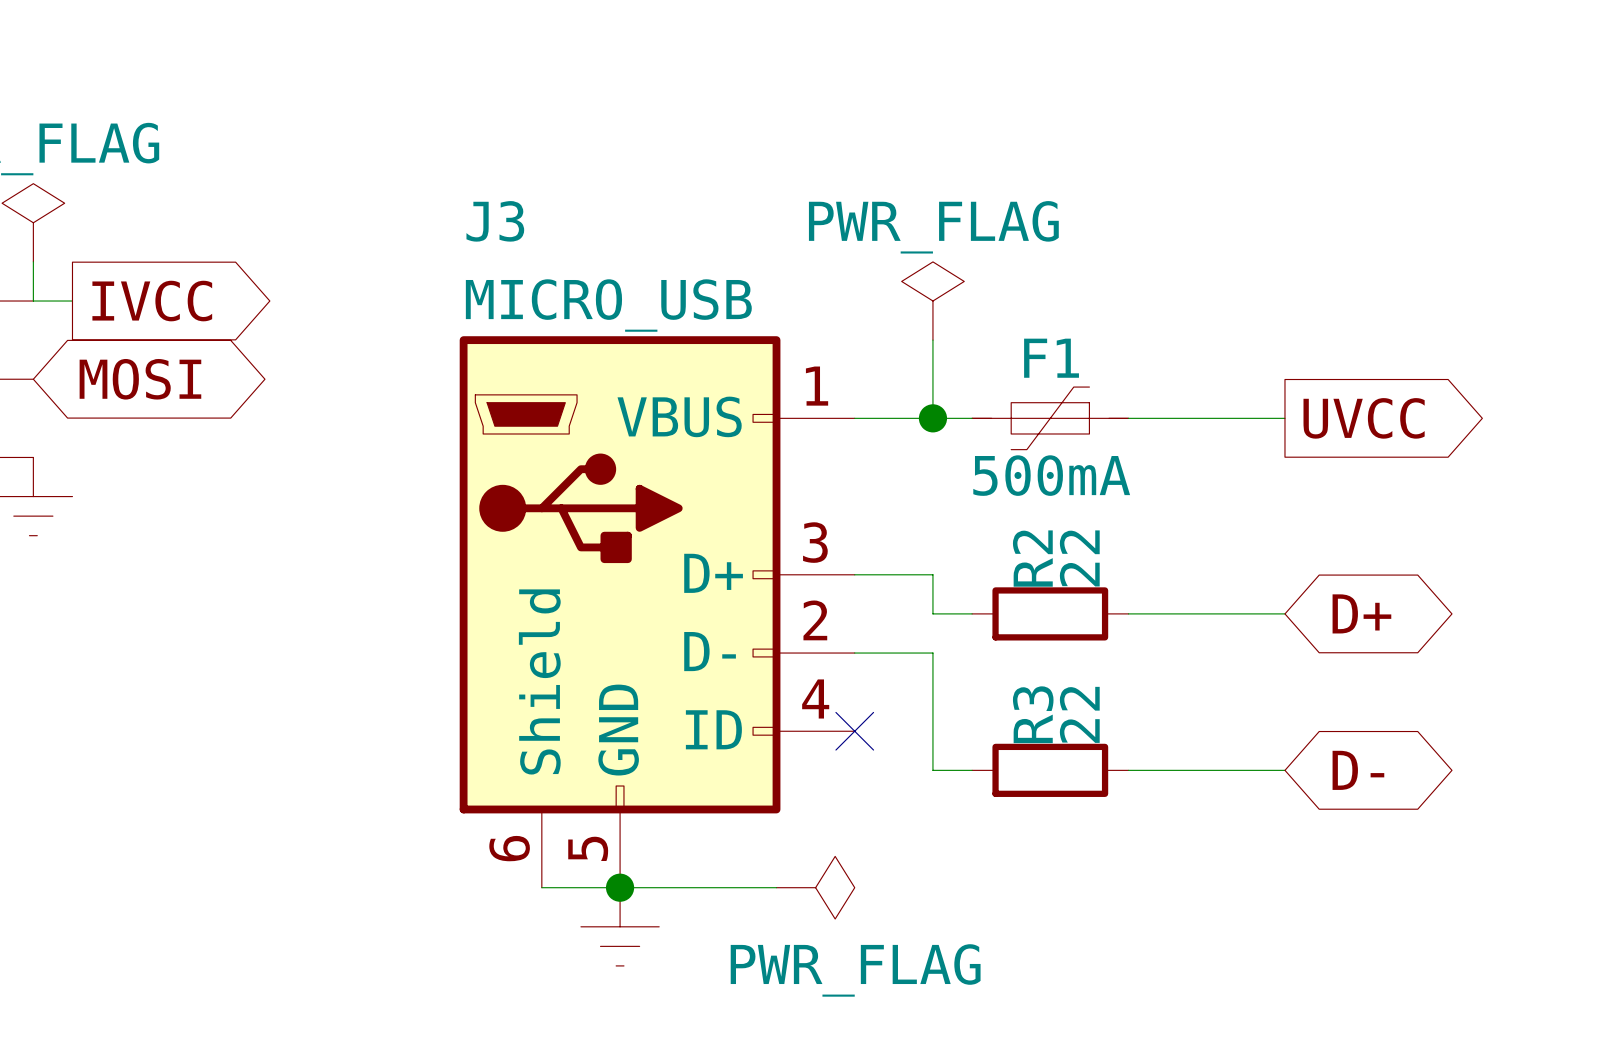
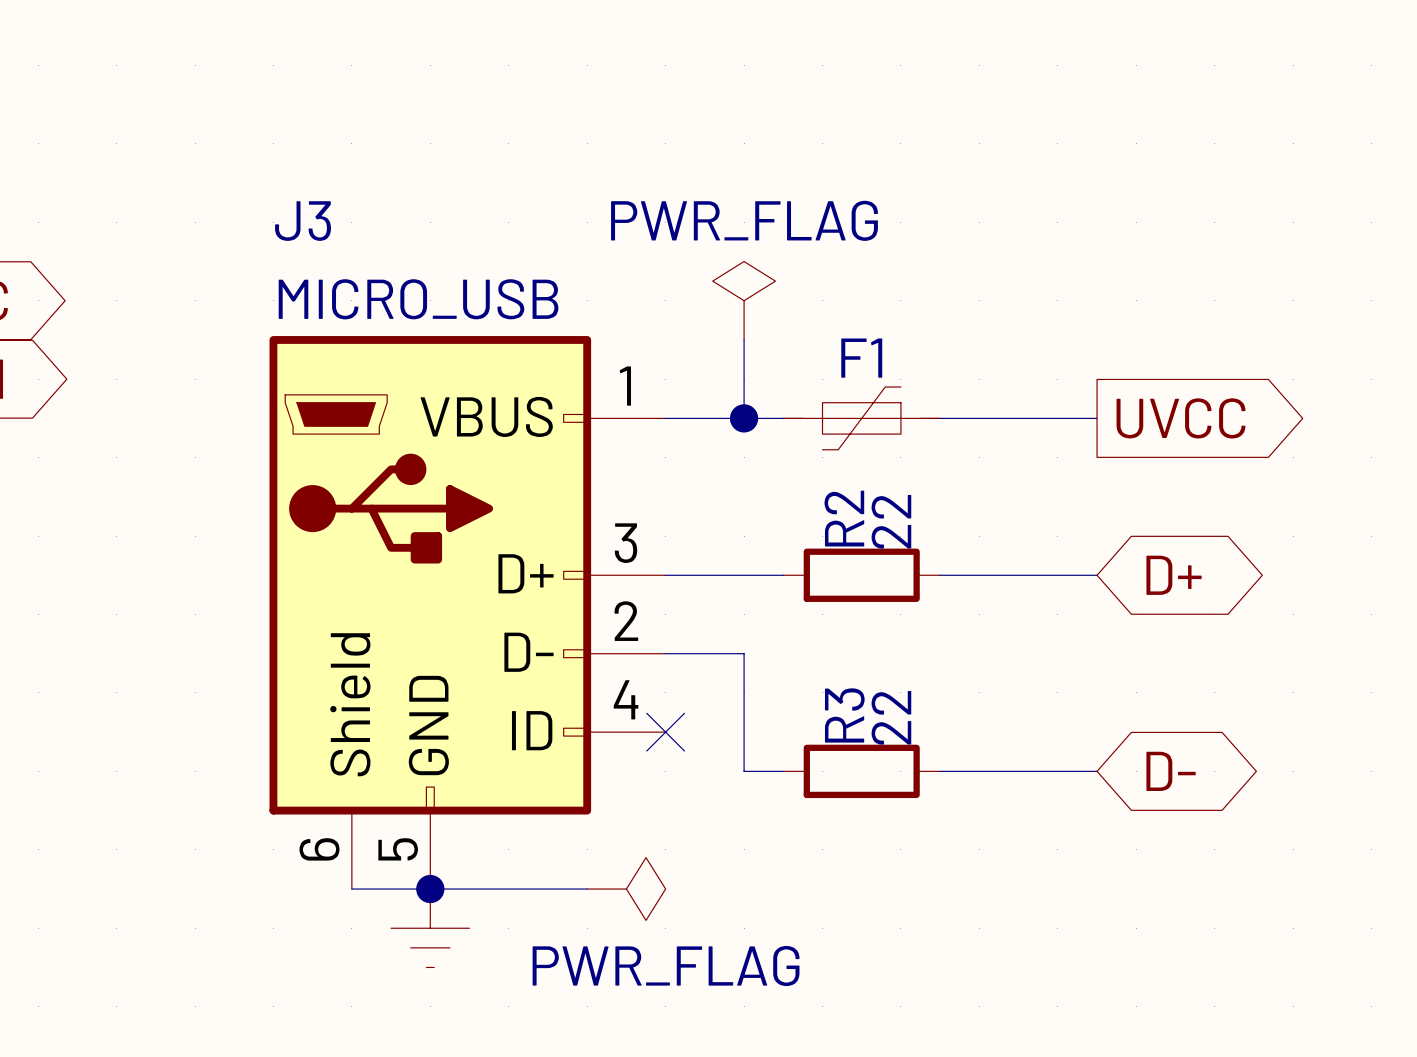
F1 value: 500mA (1051, 475) -> none
wire: (932, 574) (932, 613) (972, 613) -> (744, 575) (783, 575)
R2 position: (1050, 613) -> (861, 575)
wire: (1128, 613) (1284, 613) -> (940, 575) (1097, 575)
global label position: D+ (1361, 613) -> D+ (1174, 575)

